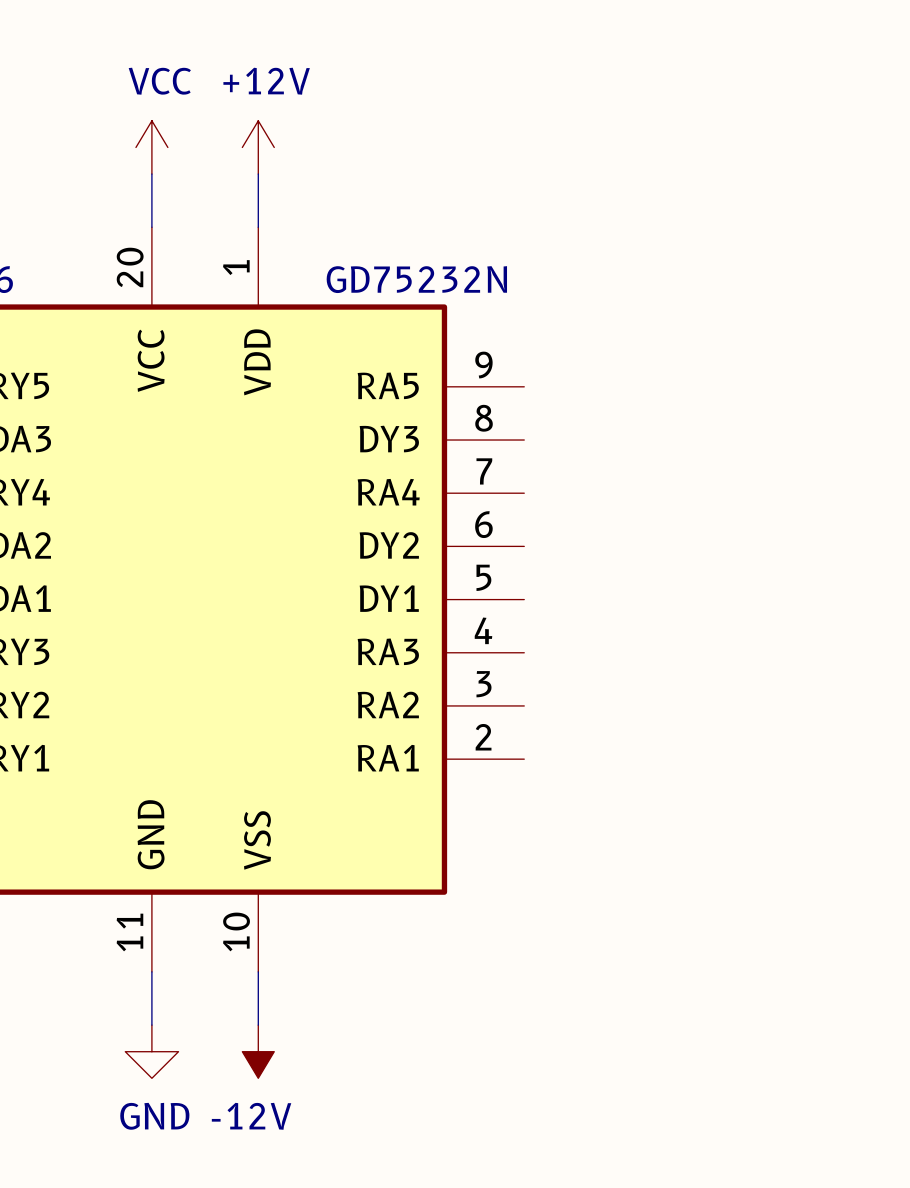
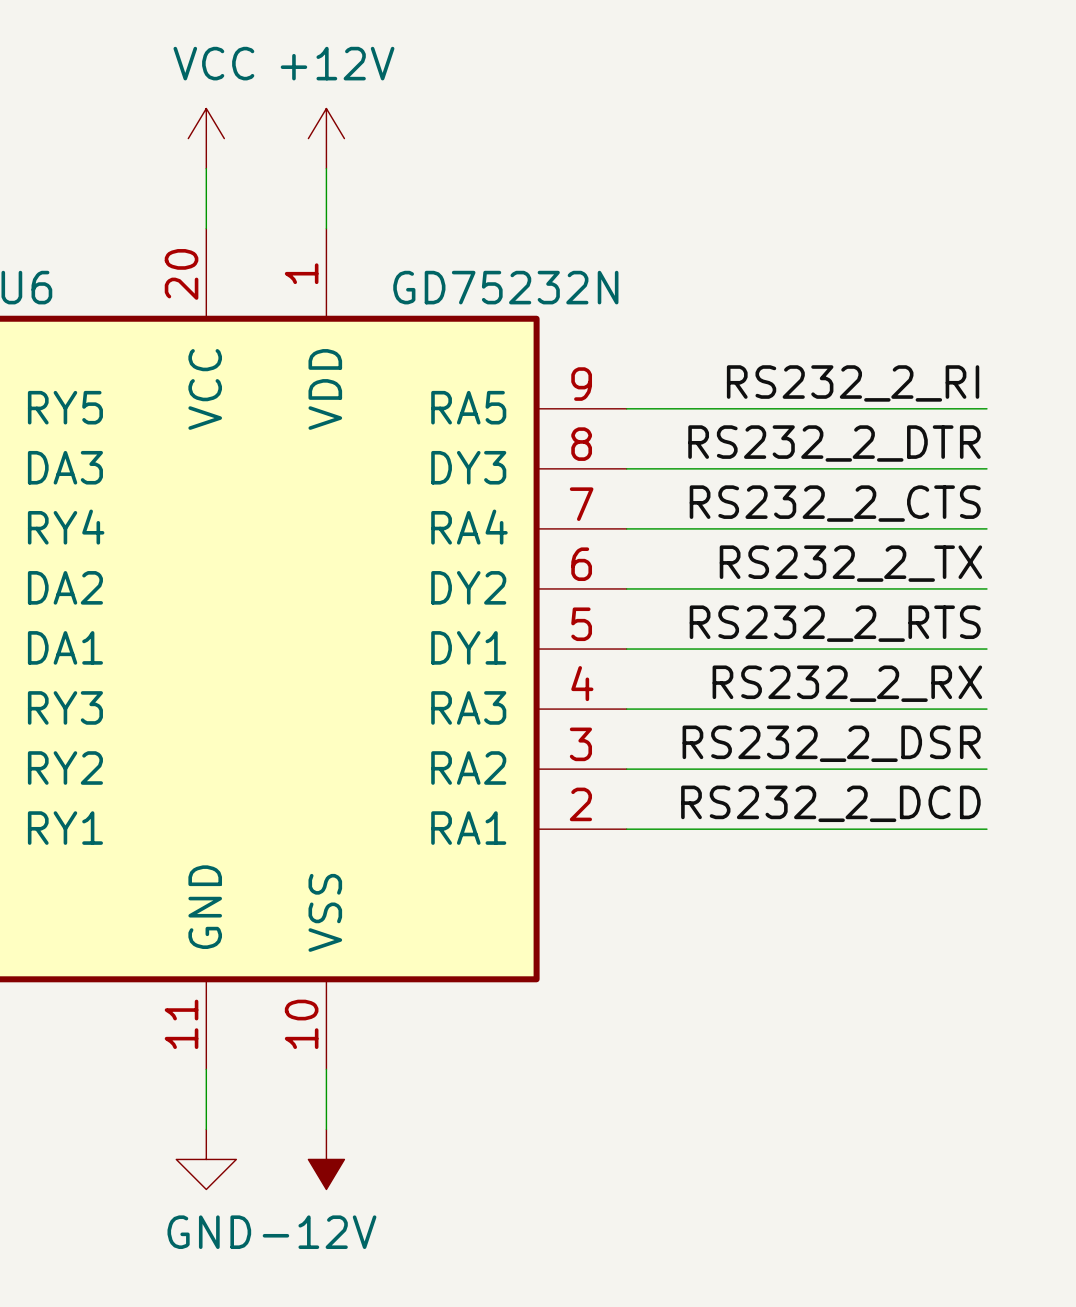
label: none -> RS232_2_RI (853, 383)
wire: none -> (626, 408) (986, 408)
label: none -> RS232_2_DTR (834, 443)
wire: none -> (626, 468) (986, 468)
label: none -> RS232_2_CTS (835, 503)
wire: none -> (626, 528) (986, 528)
label: none -> RS232_2_TX (850, 563)
wire: none -> (626, 588) (986, 588)
label: none -> RS232_2_RTS (835, 623)
wire: none -> (626, 649) (986, 649)
label: none -> RS232_2_RX (847, 683)
wire: none -> (626, 709) (986, 709)
label: none -> RS232_2_DSR (831, 743)
wire: none -> (626, 769) (986, 769)
label: none -> RS232_2_DCD (830, 803)
wire: none -> (626, 829) (986, 829)

